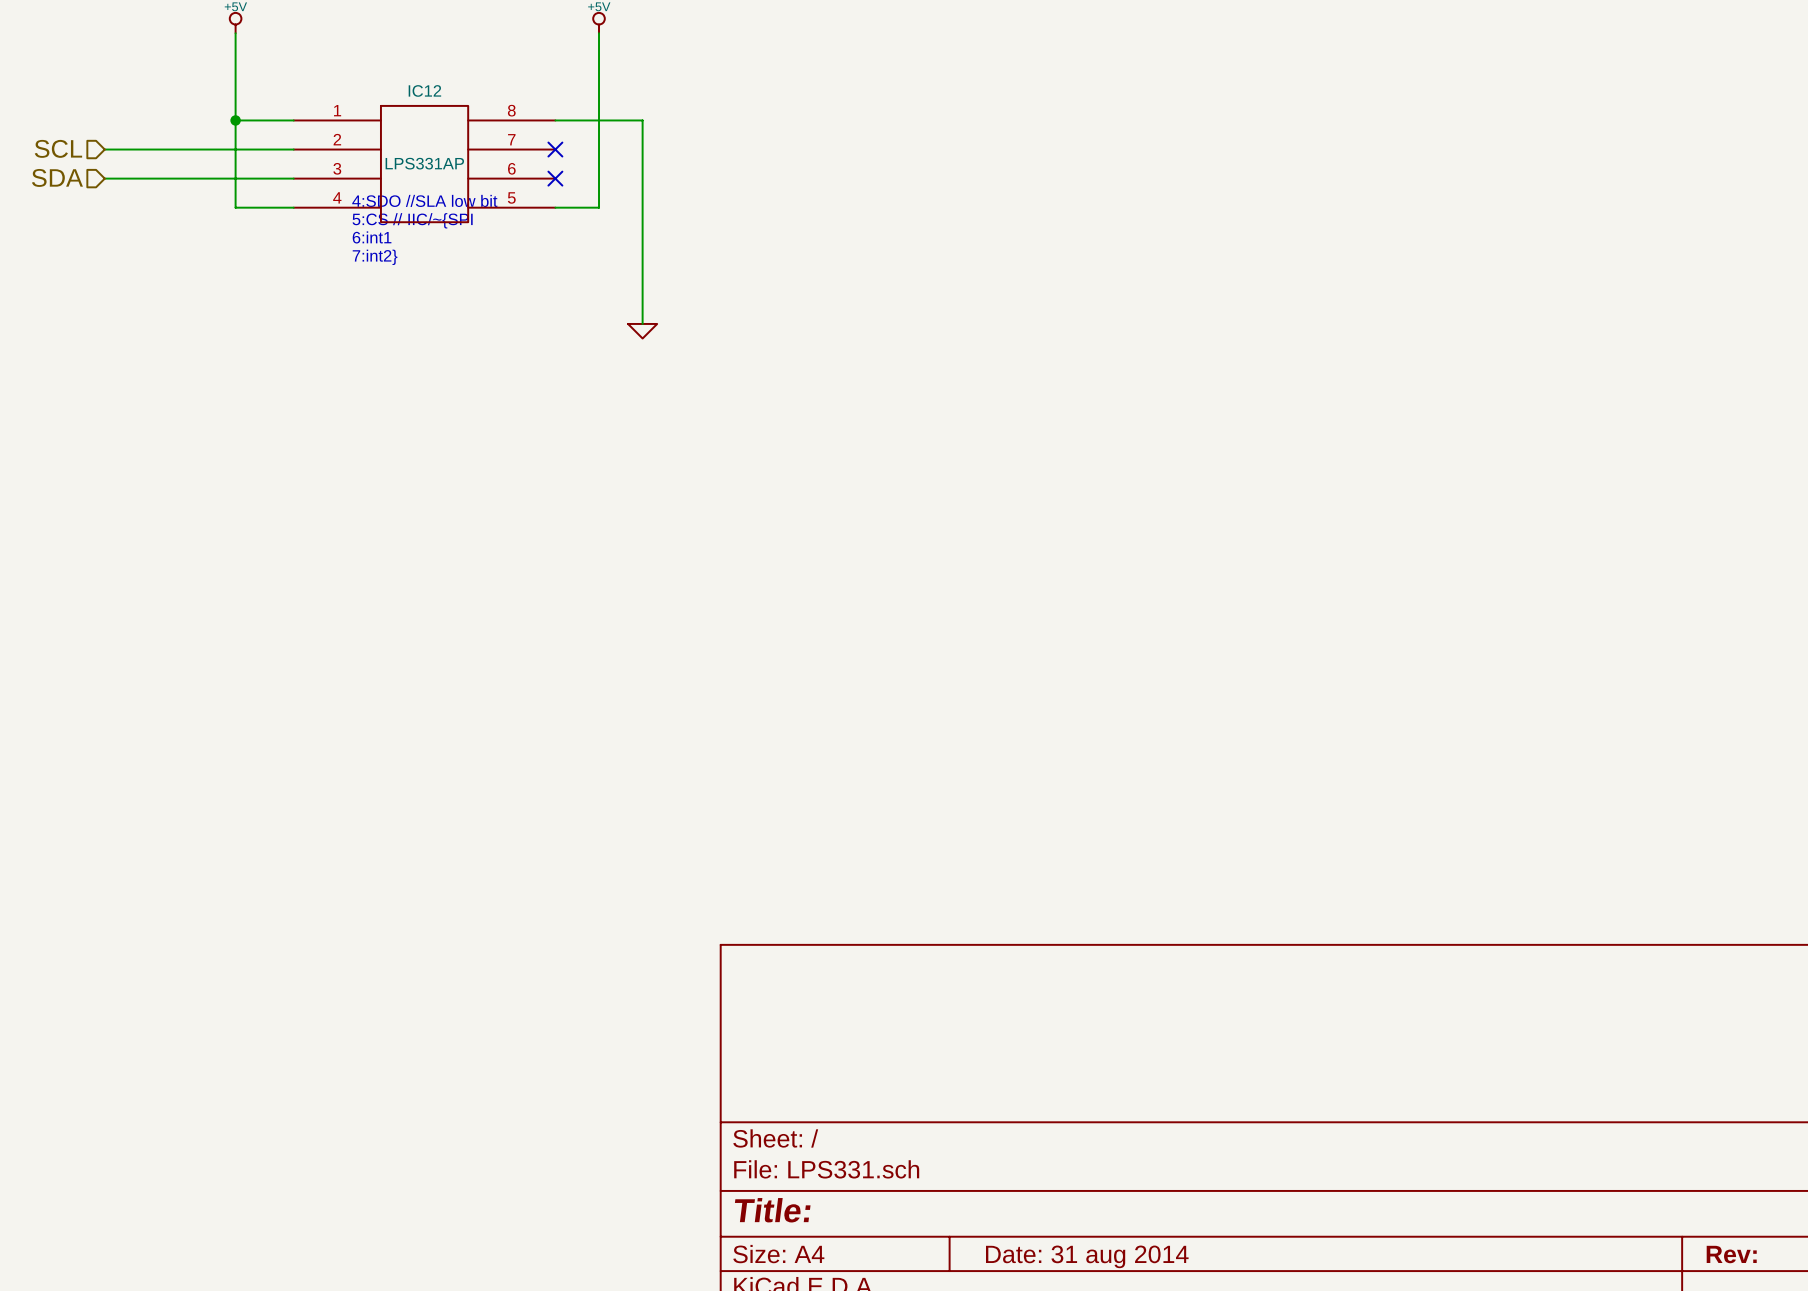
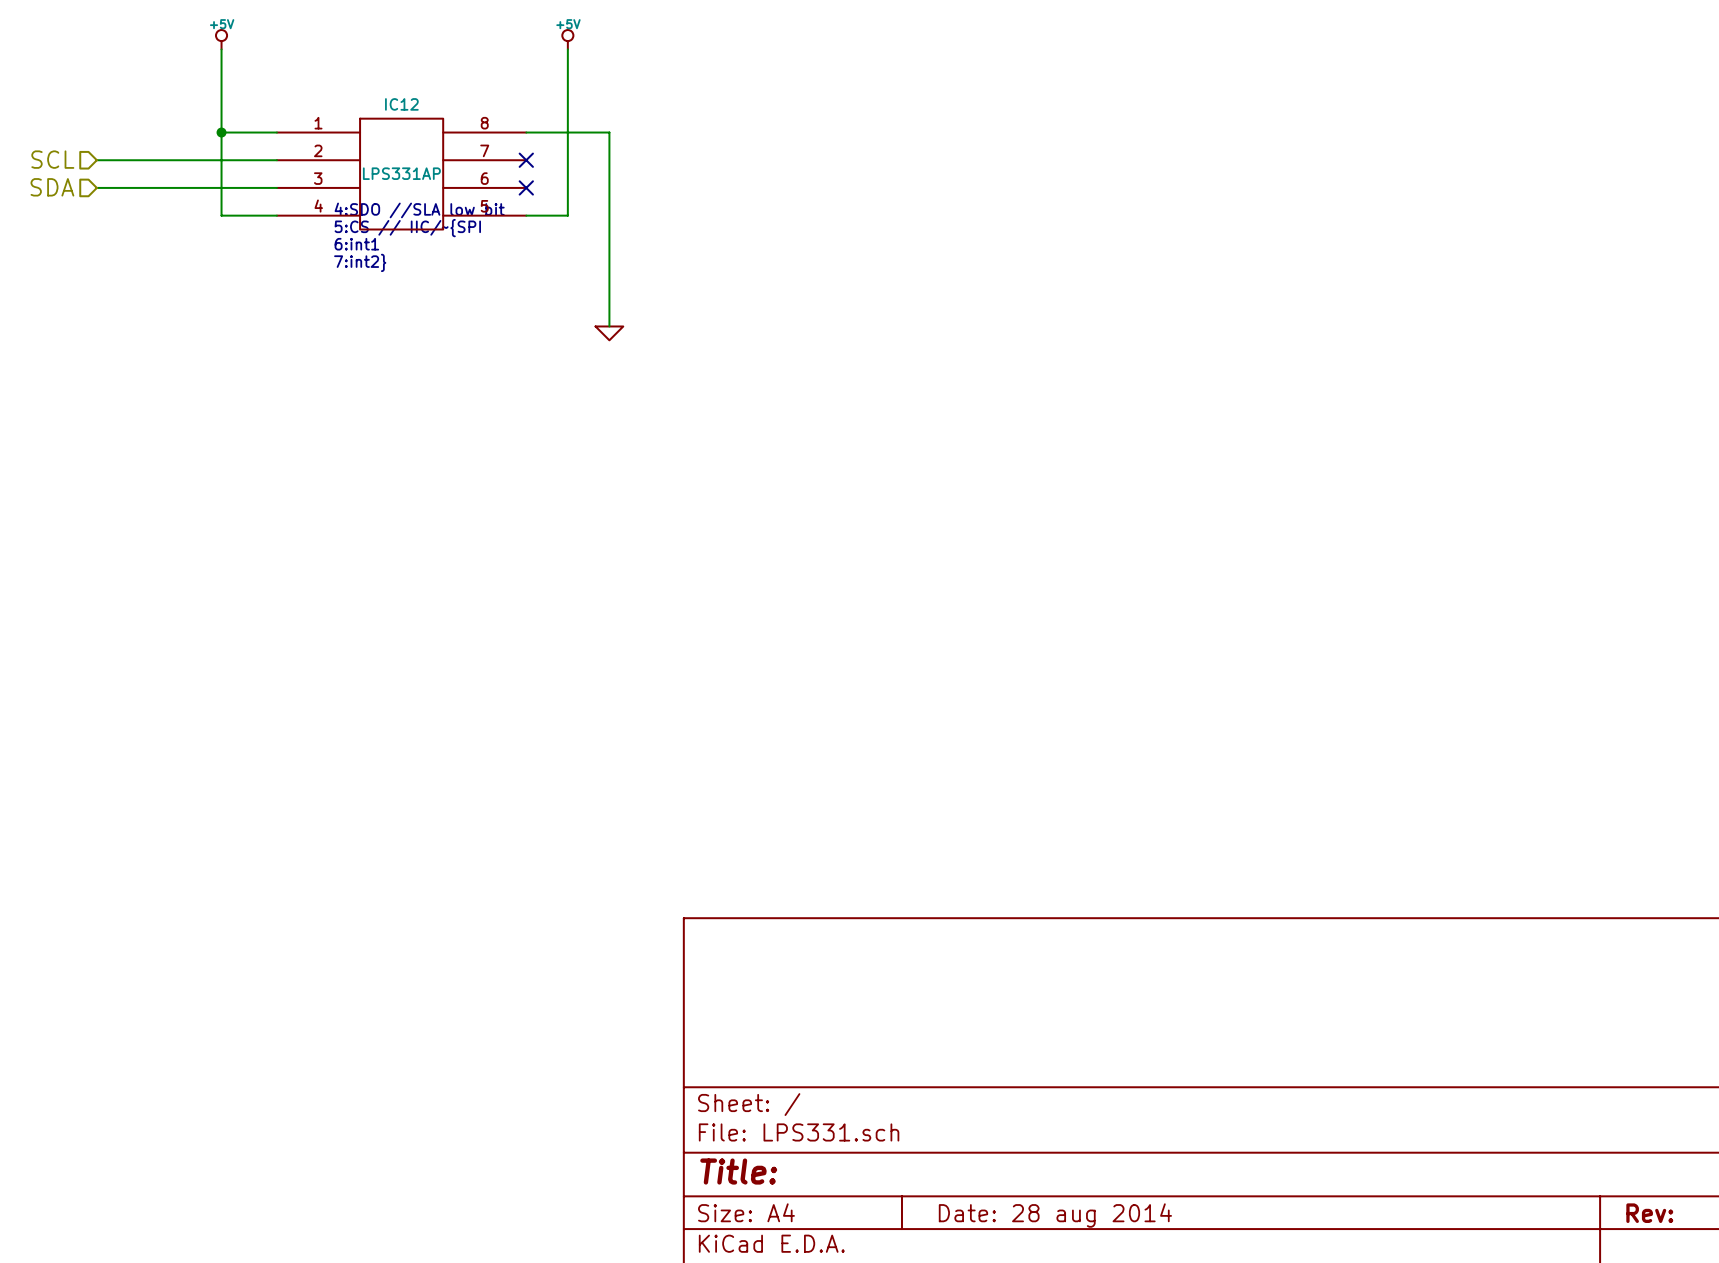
title block: Date: 31 aug 2014 (1087, 1256) -> Date: 28 aug 2014 (1055, 1215)

